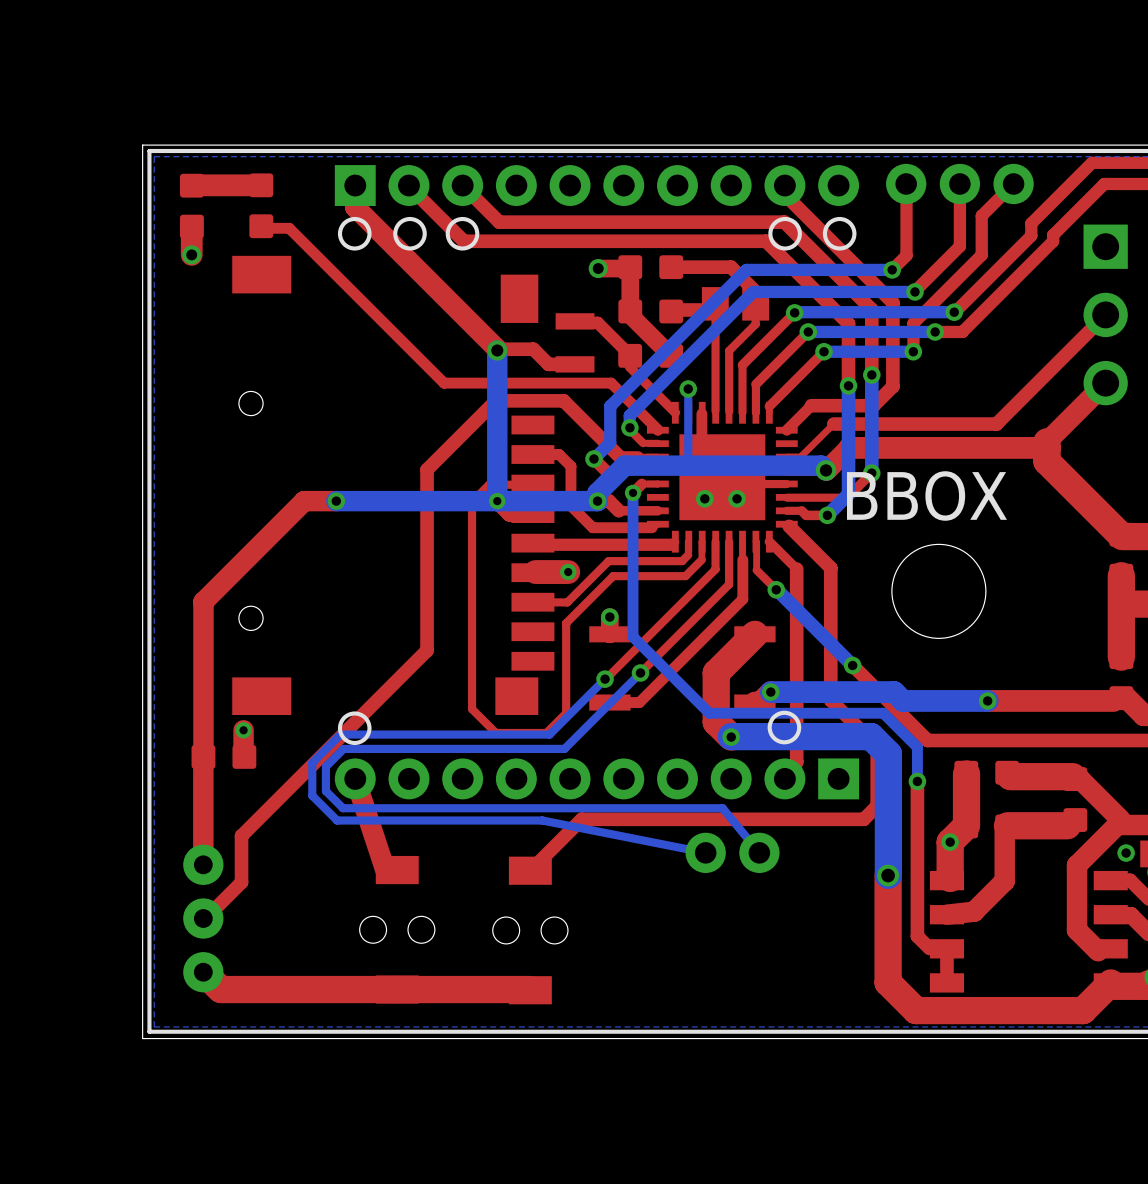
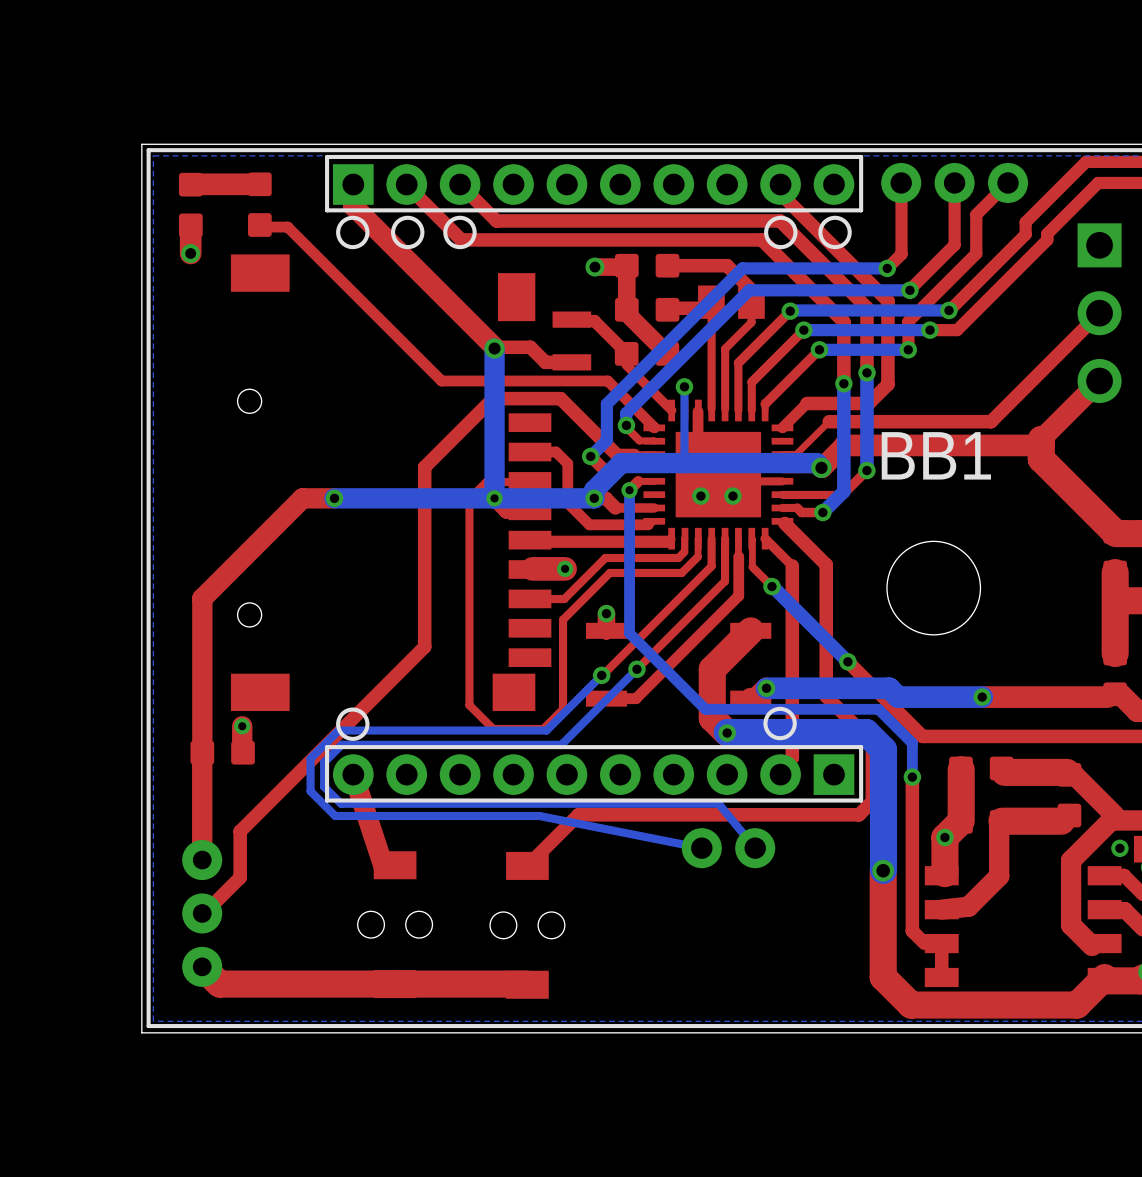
line: none -> (861, 156) (327, 156) (327, 210) (861, 210) (861, 156)
BBOX name: BBOX (926, 496) -> BB1 (936, 455)
line: none -> (861, 747) (861, 800) (327, 800) (327, 747) (861, 747)

